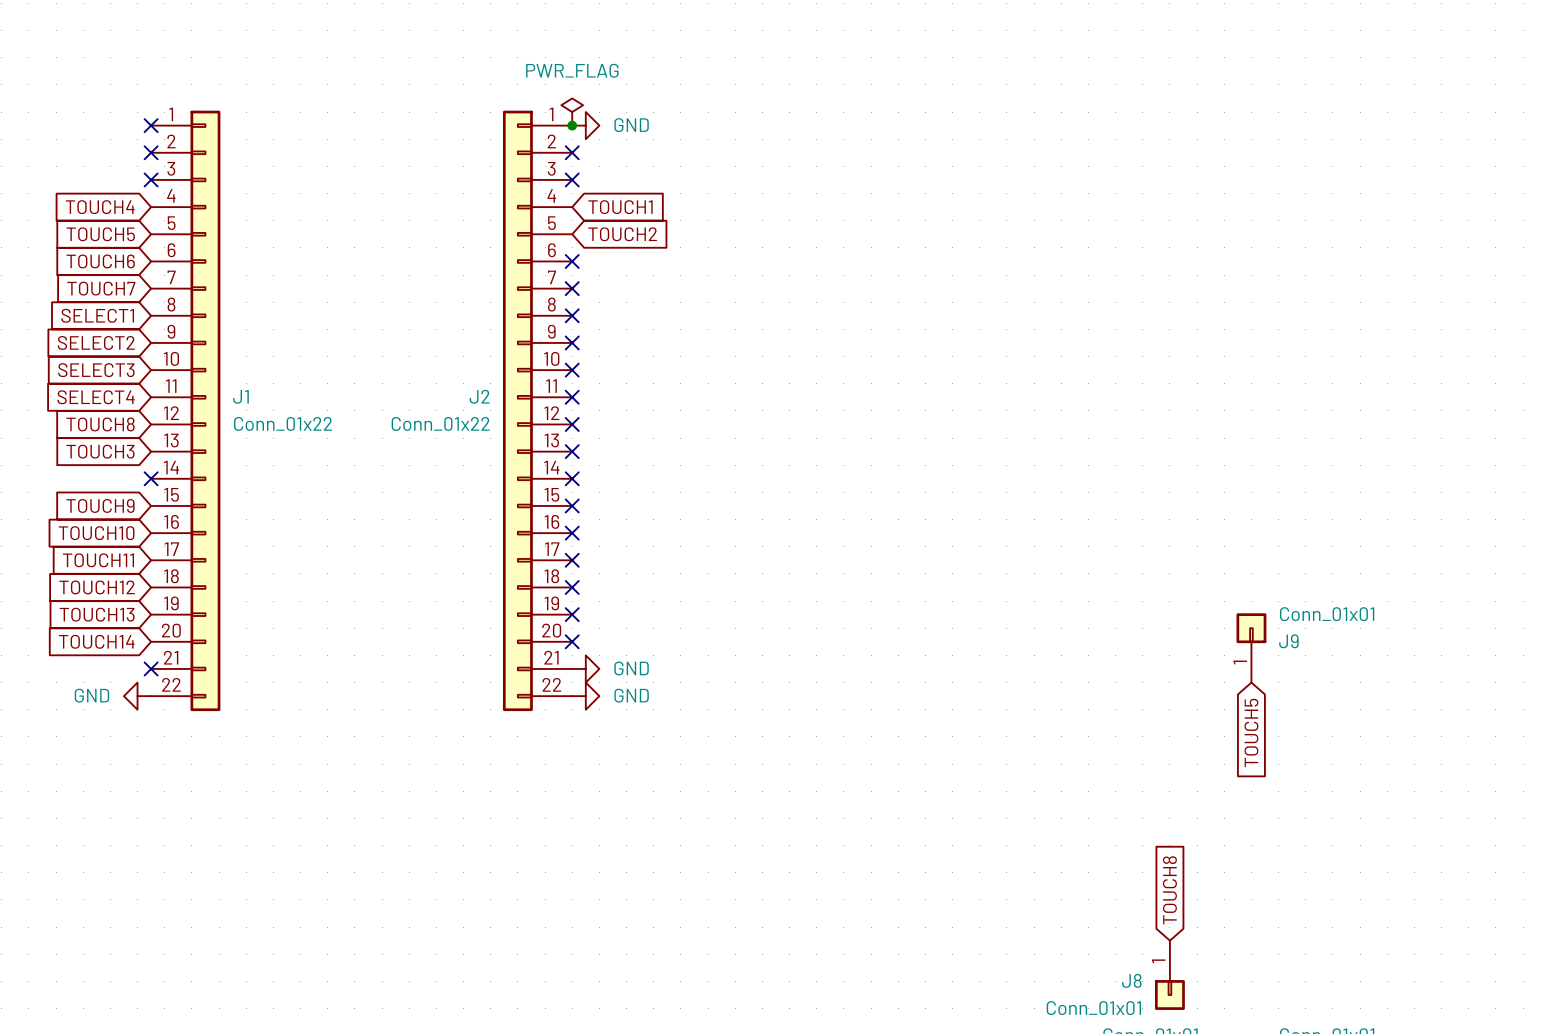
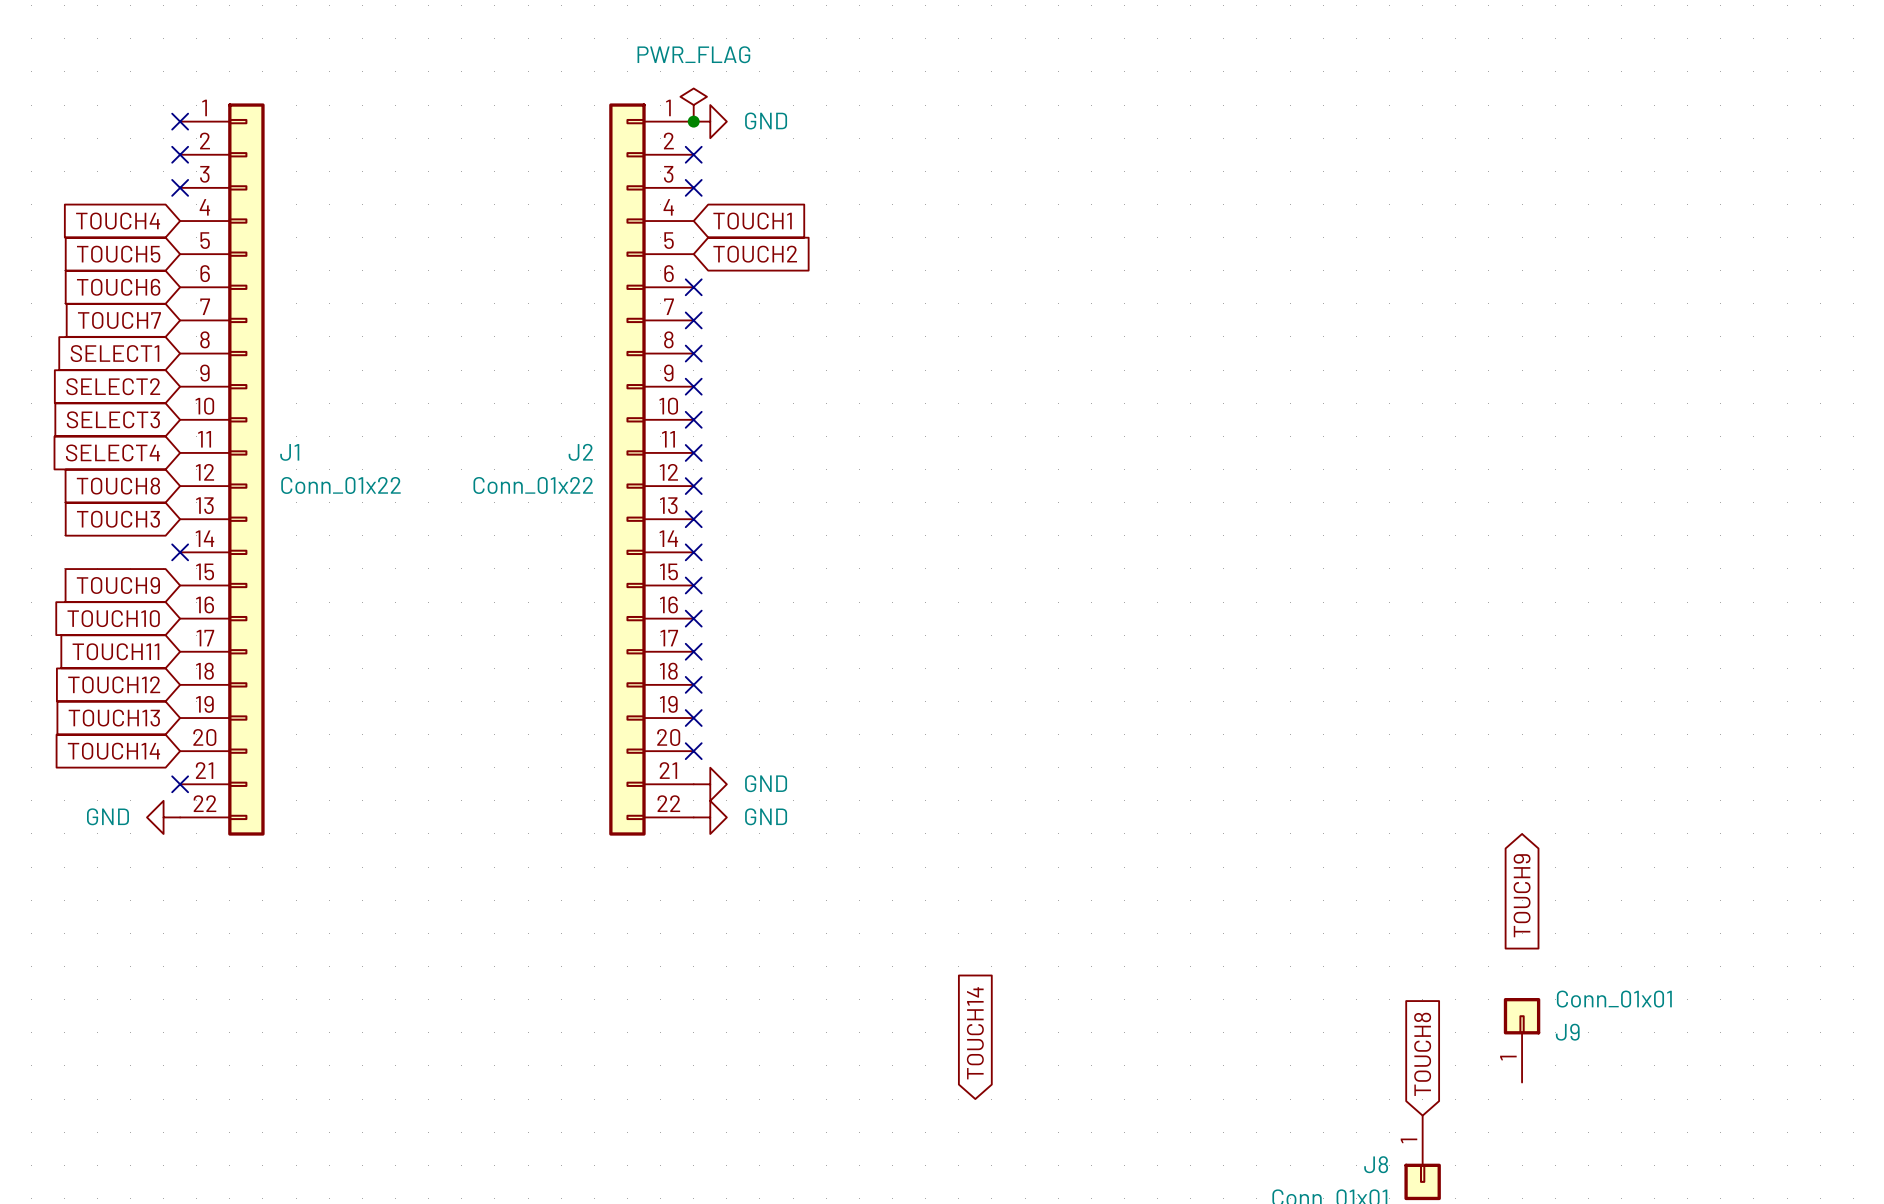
J9 position: (1251, 647) -> (1522, 1040)
global label: TOUCH5 (1251, 732) -> TOUCH9 (1522, 895)
global label: none -> TOUCH14 (975, 1033)

